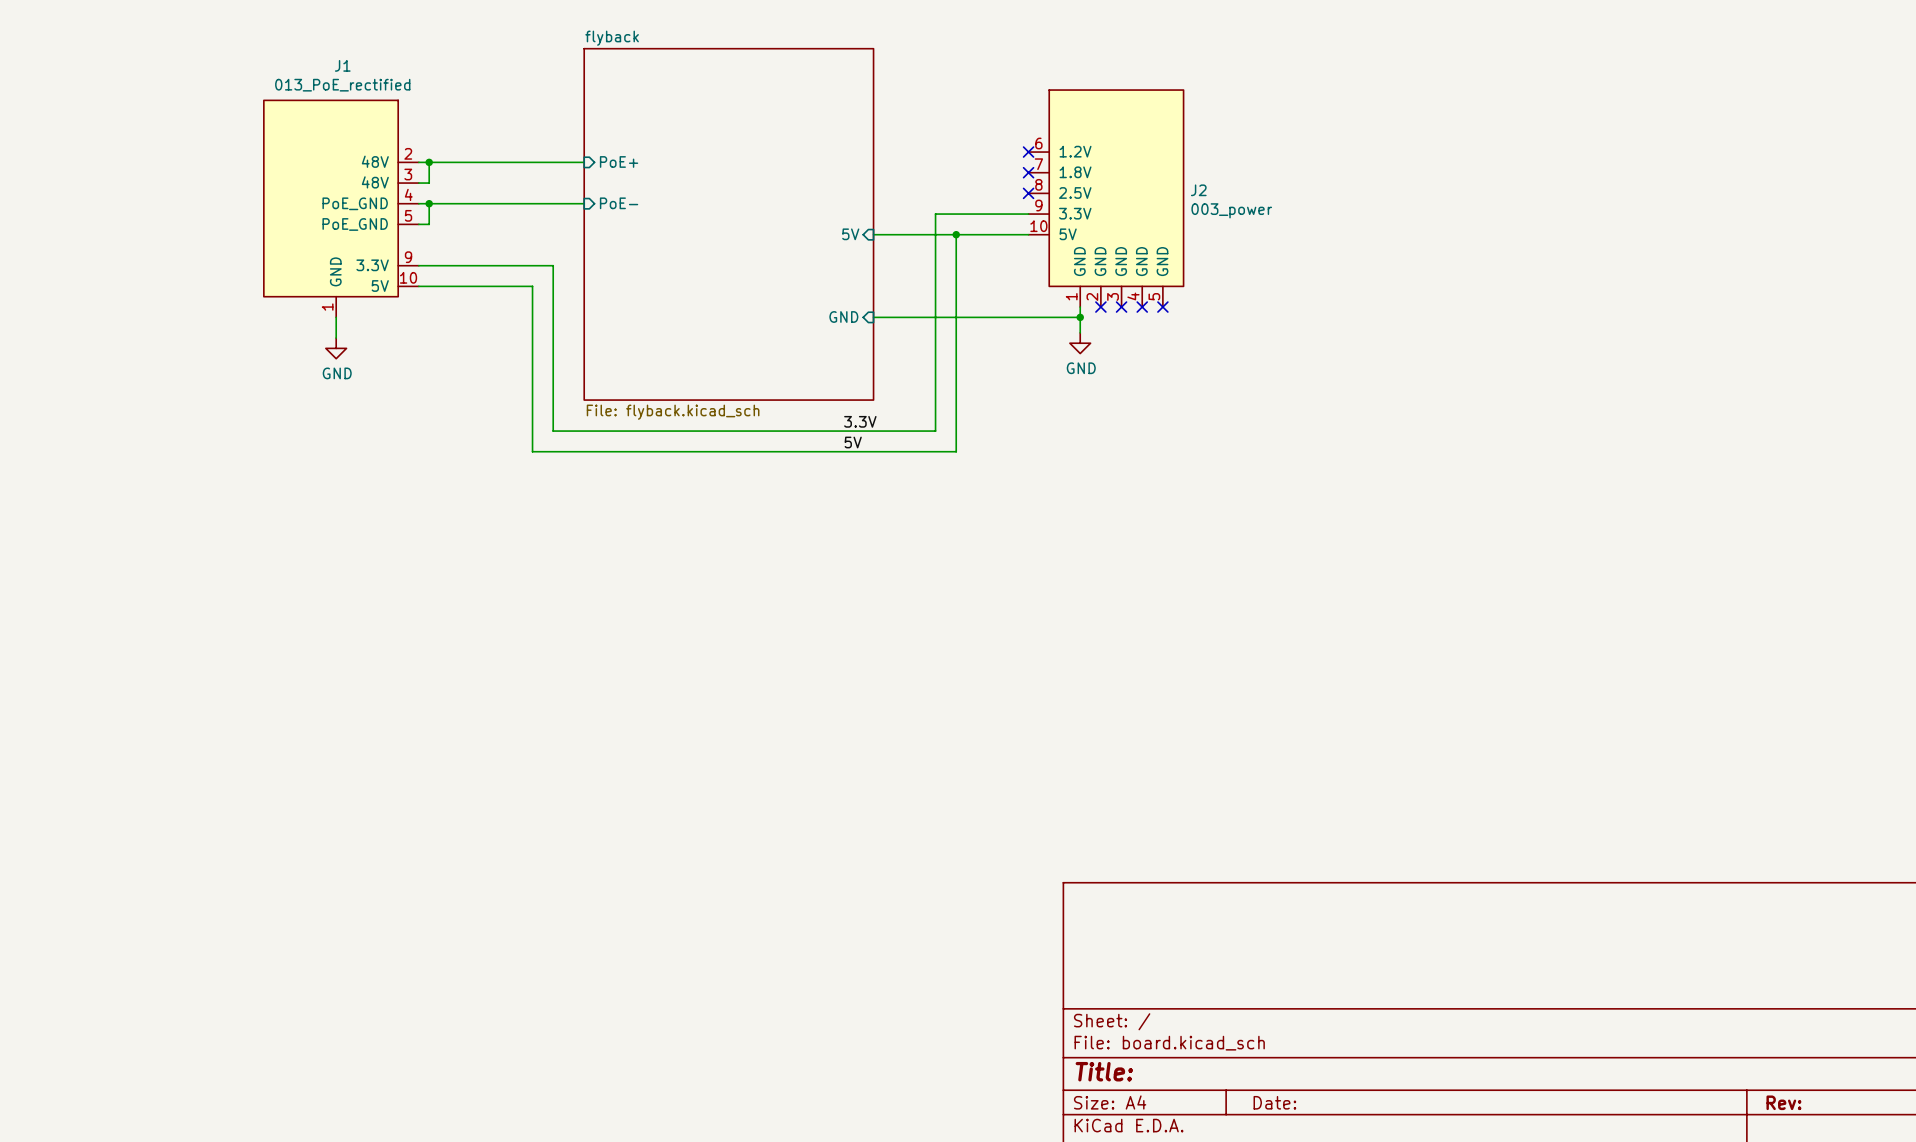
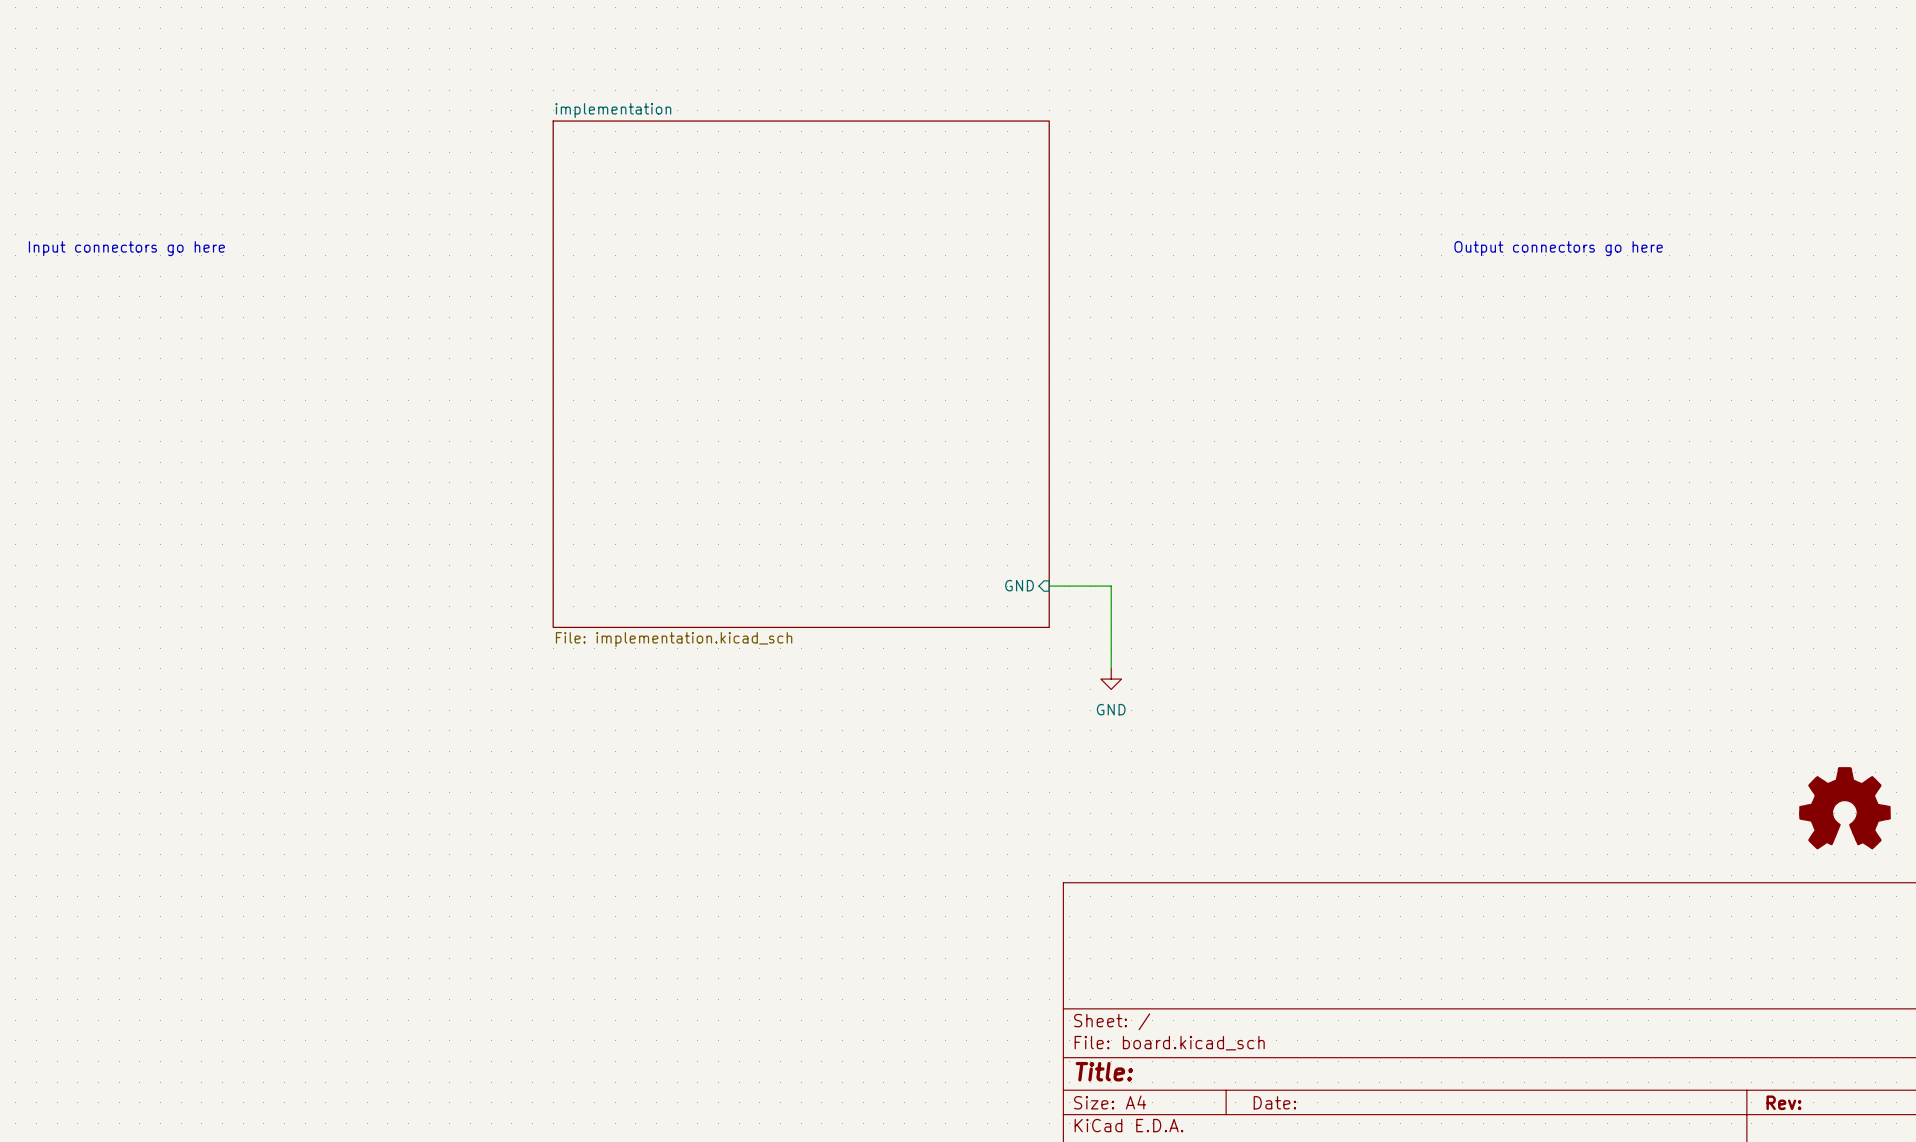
no-connect mark: (1028, 152) -> none
sheet pin: PoE+ (619, 161) -> none
wire: (418, 162) (584, 162) -> none
wire: (429, 162) (429, 183) (418, 183) -> none
junction: (429, 162) -> none
no-connect mark: (1028, 172) -> none
no-connect mark: (1028, 193) -> none
J2: 003_power (1106, 198) -> none
wire: (418, 203) (584, 203) -> none
wire: (429, 203) (429, 224) (418, 224) -> none
junction: (429, 203) -> none
sheet pin: PoE- (619, 203) -> none
J1: 013_PoE_rectified (341, 208) -> none
wire: (1028, 214) (935, 214) (935, 431) (553, 431) (553, 265) (418, 265) -> none
sheet flyback: File: flyback.kicad_sch (728, 224) -> none
sheet pin: 5V (850, 234) -> none
wire: (873, 234) (1028, 234) -> none
wire: (956, 234) (956, 451) (532, 451) (532, 286) (418, 286) -> none
junction: (956, 234) -> none
text: none -> Input connectors go here (126, 248)
text: none -> Output connectors go here (1558, 248)
wire: (1080, 307) (1080, 332) -> none
no-connect mark: (1100, 307) -> none
no-connect mark: (1121, 307) -> none
no-connect mark: (1142, 307) -> none
no-connect mark: (1162, 307) -> none
sheet pin: GND (843, 316) -> none
wire: (336, 317) (336, 338) -> none
wire: (873, 317) (1080, 317) -> none
junction: (1080, 317) -> none
power symbol: GND (1080, 343) -> none
power symbol: GND (336, 348) -> none
sheet implementation: none -> File: implementation.kicad_sch (801, 374)
label: 3.3V (860, 421) -> none
label: 5V (853, 442) -> none
sheet pin: none -> GND (1019, 585)
wire: none -> (1049, 586) (1111, 586) (1111, 668)
power symbol: none -> GND (1111, 679)
part: none -> (1844, 808)

